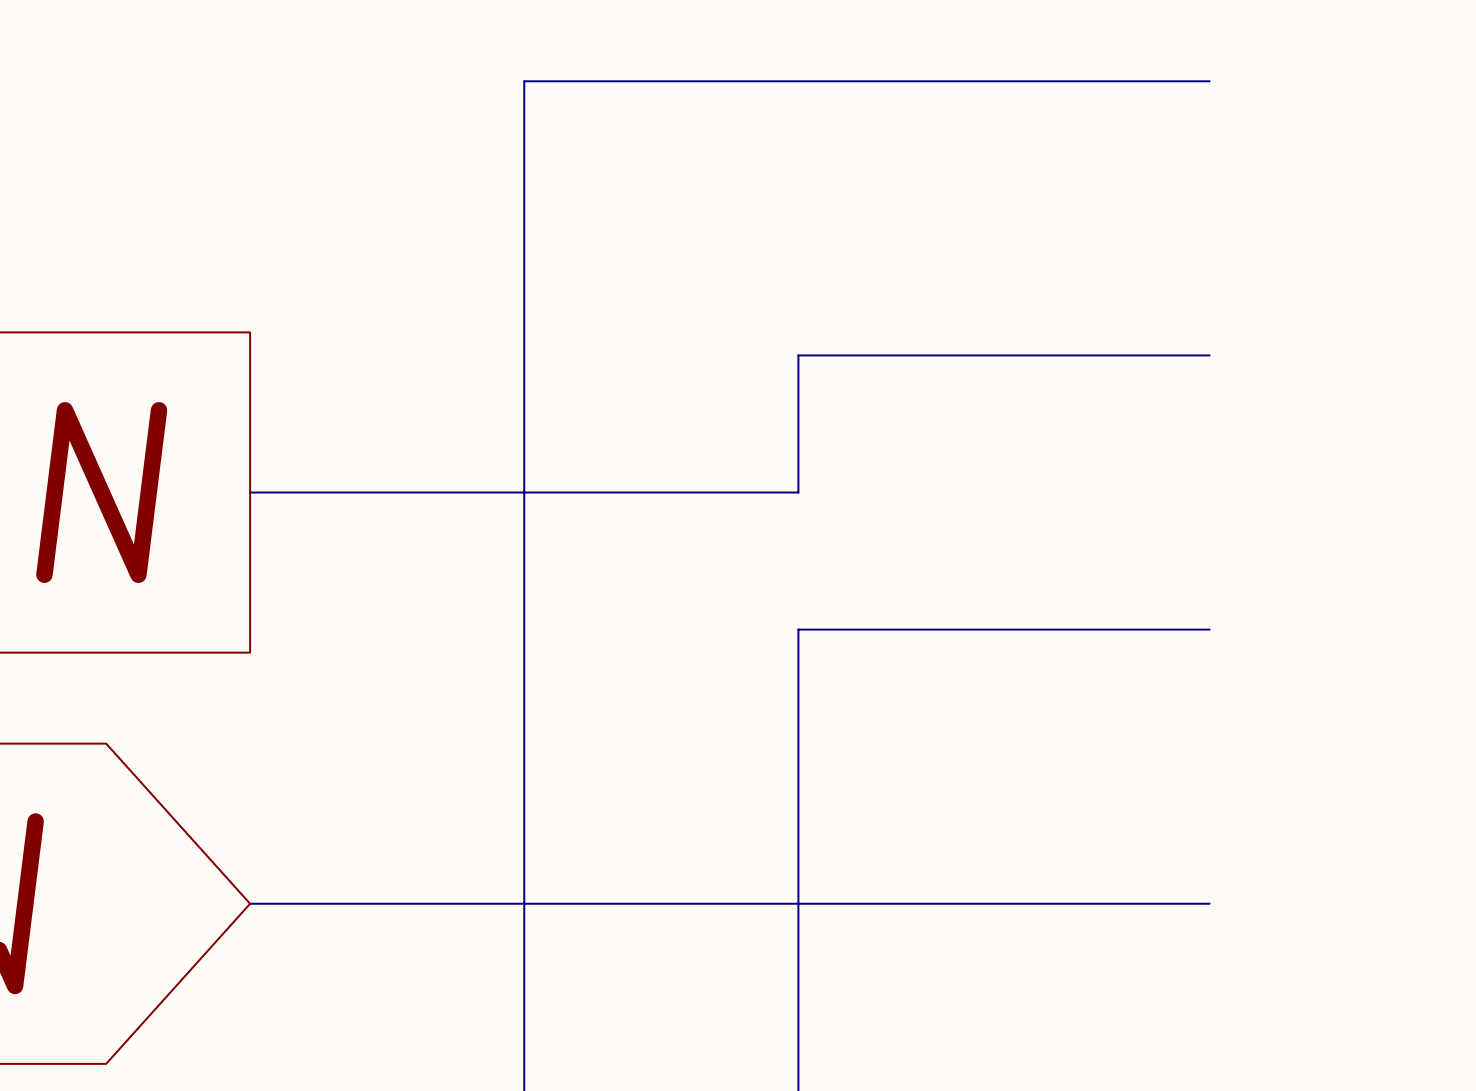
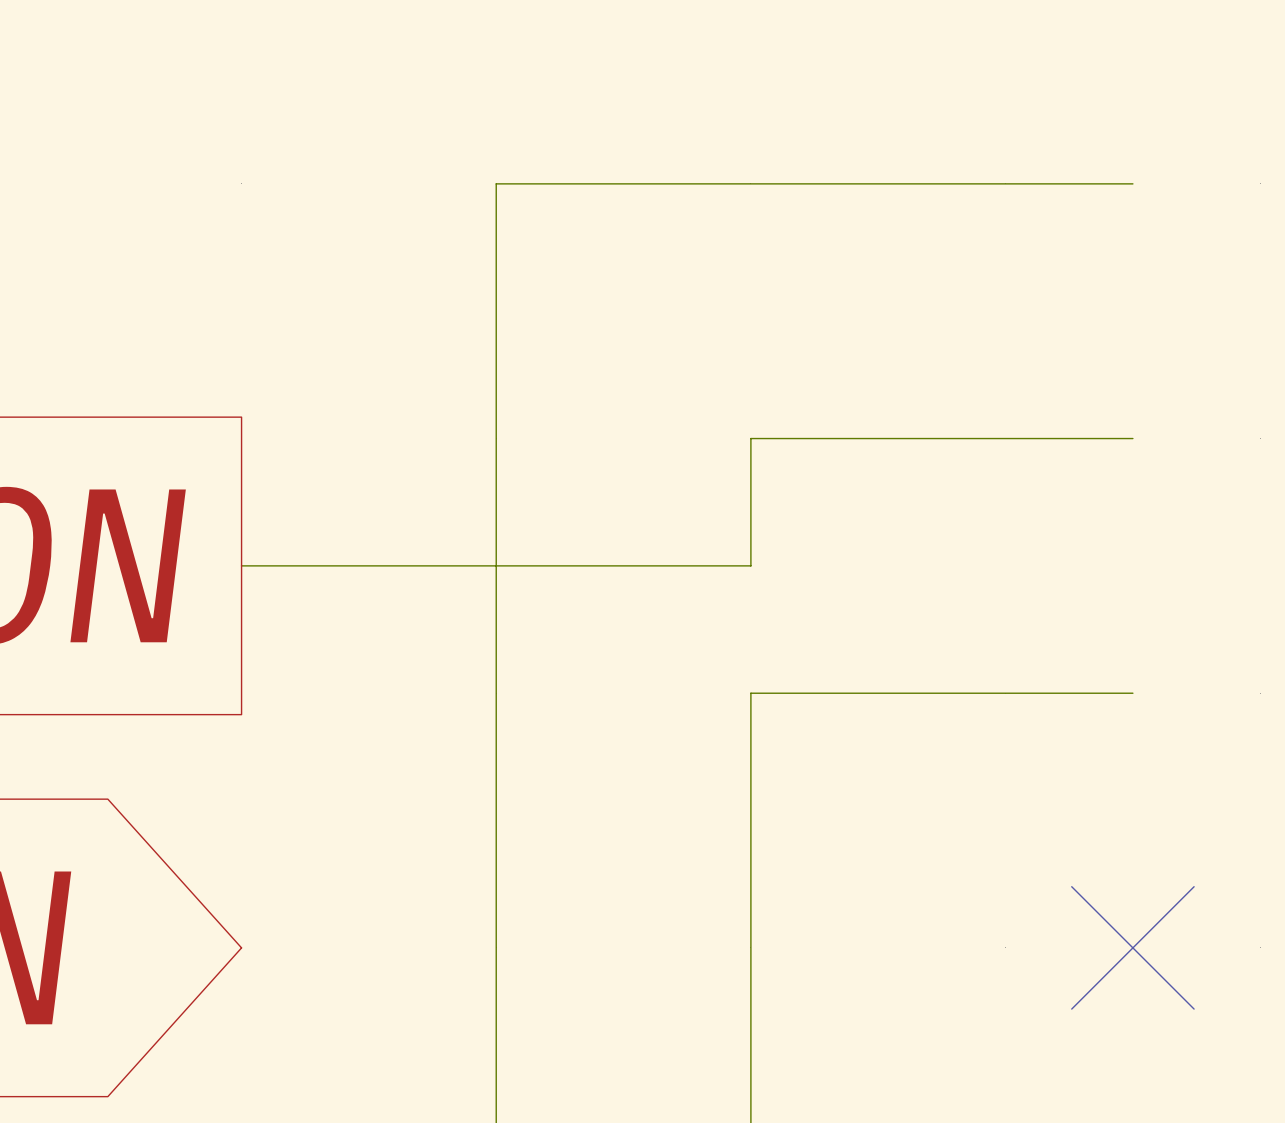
wire: (250, 903) (1209, 903) -> none
no-connect mark: none -> (1132, 947)

